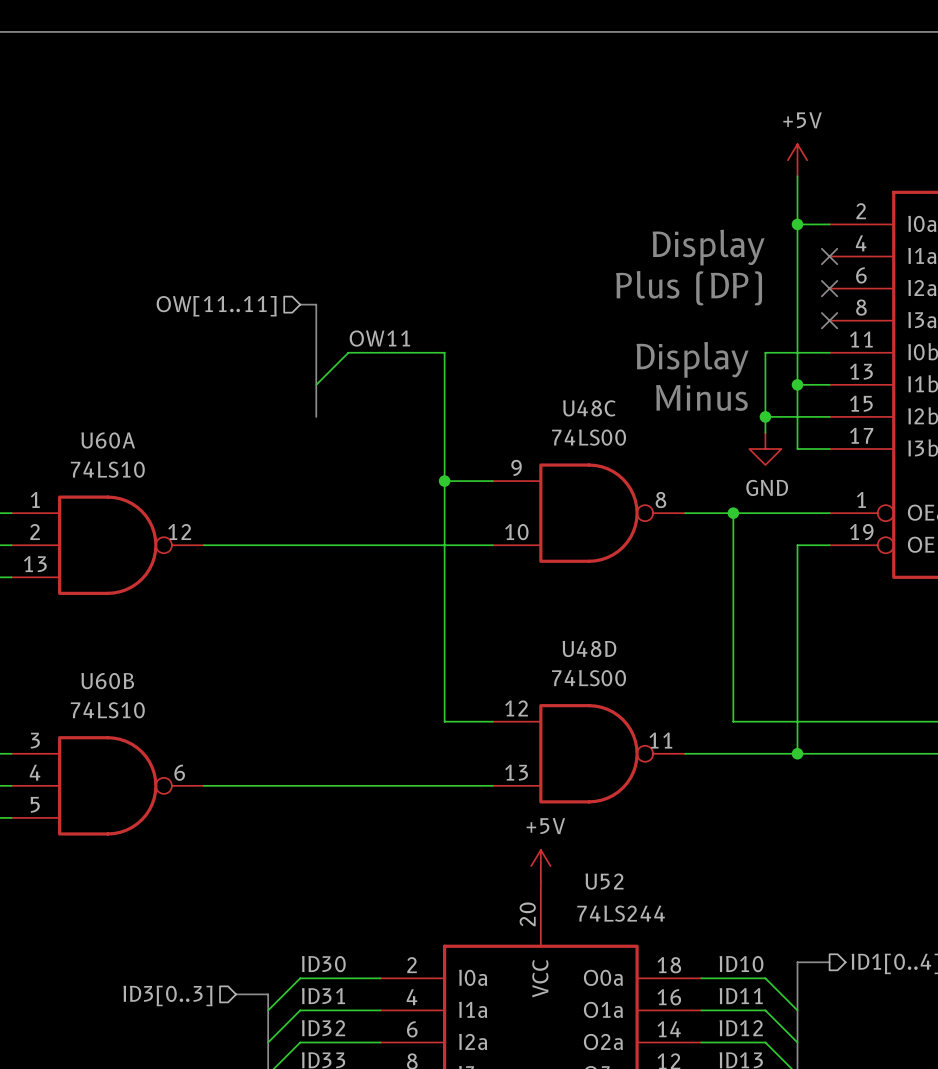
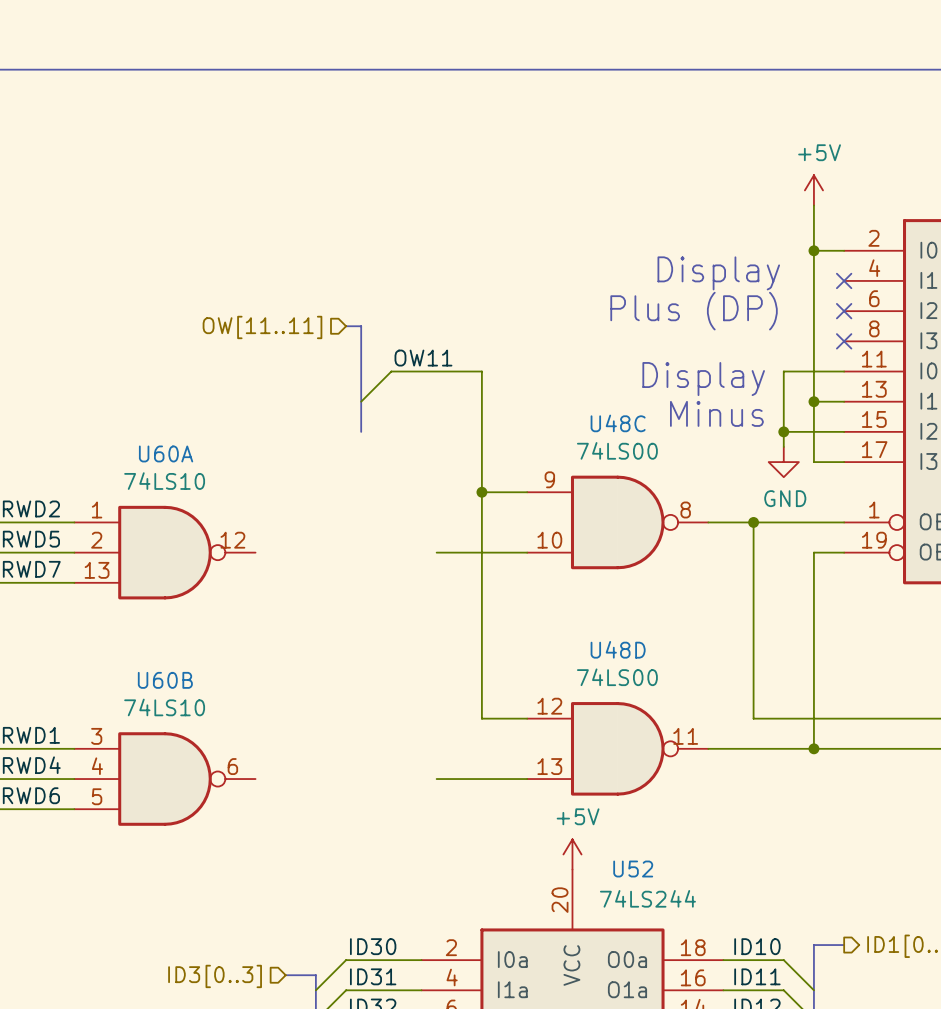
wire: (204, 545) (396, 545) -> none
wire: (204, 785) (396, 785) -> none

